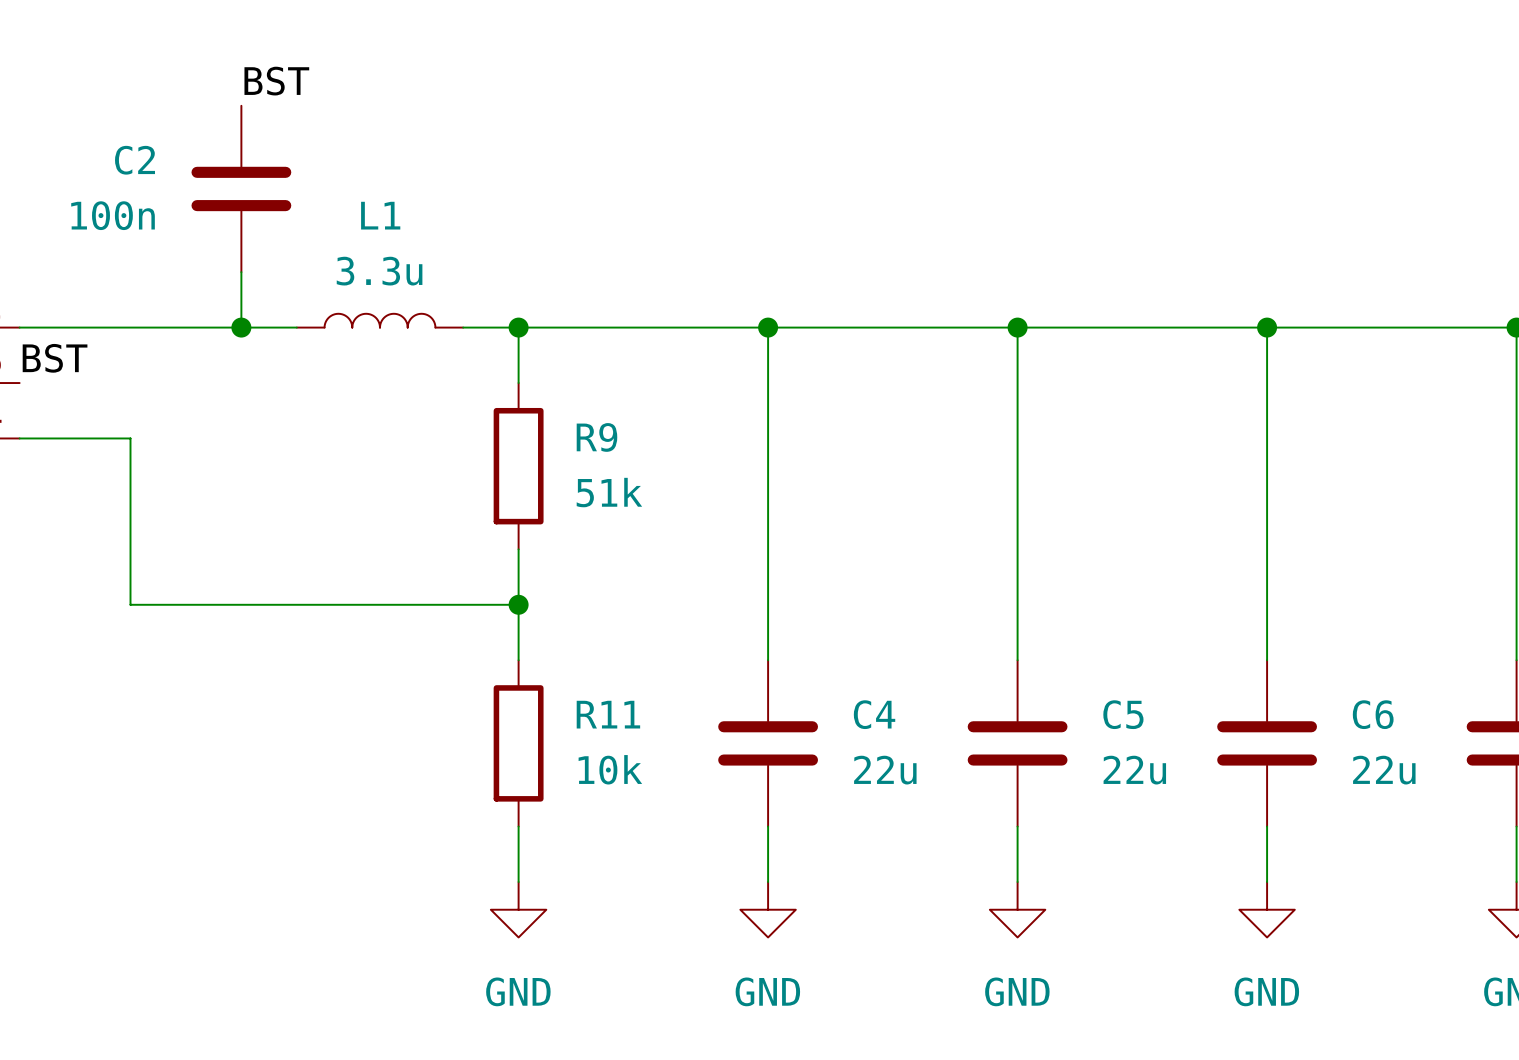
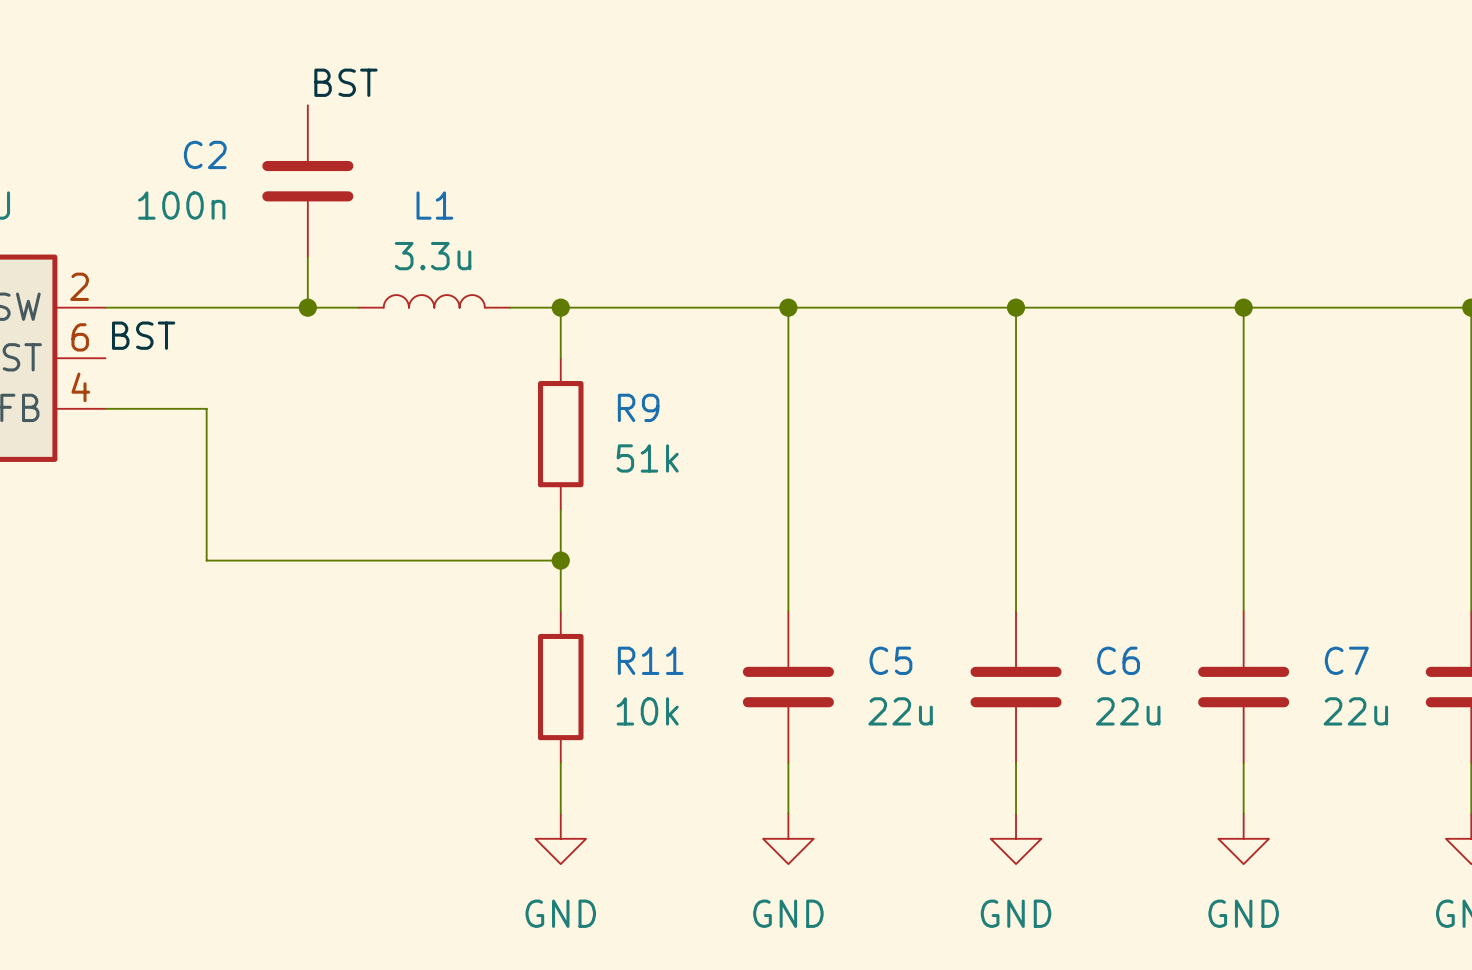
C4 name: C4 (874, 714) -> C5 (890, 660)
C5 name: C5 (1123, 714) -> C6 (1118, 660)
C6 name: C6 (1373, 714) -> C7 (1346, 660)

